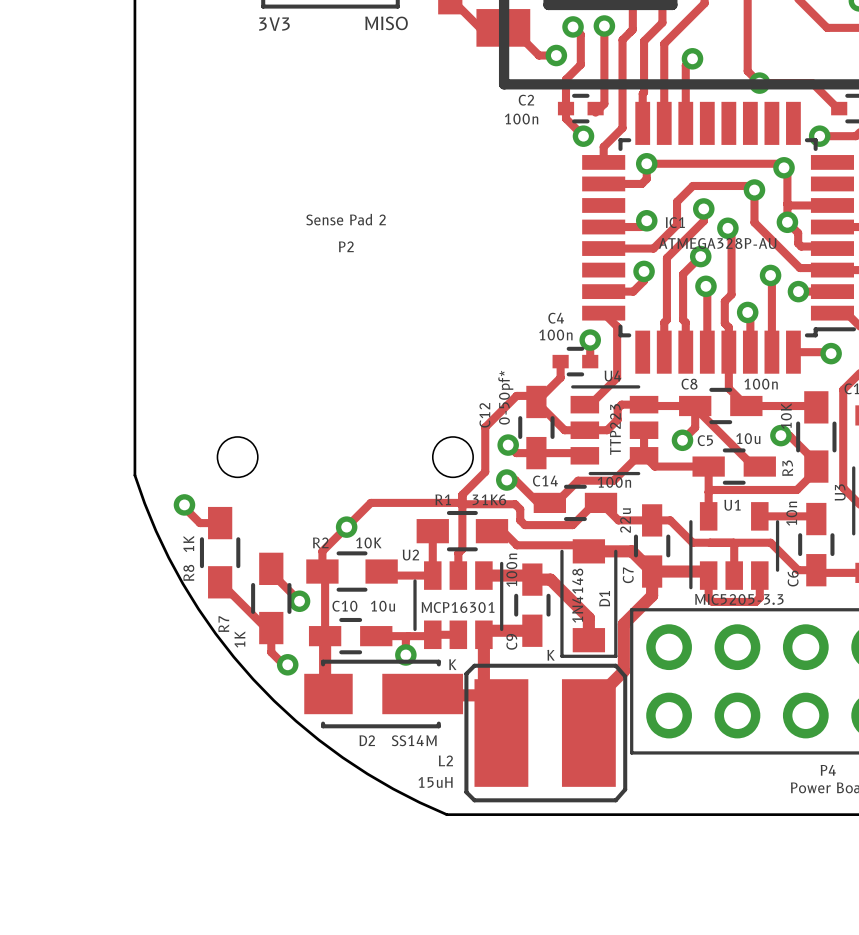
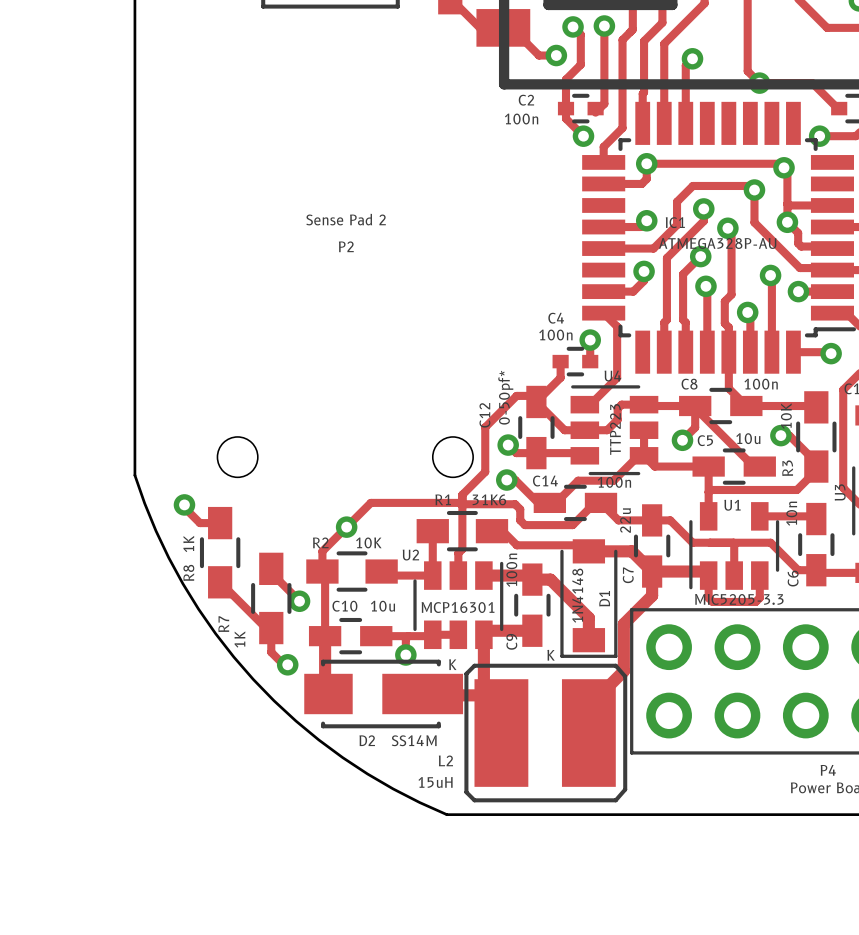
text: MISO (386, 23) -> none
text: 3V3 (274, 24) -> none

